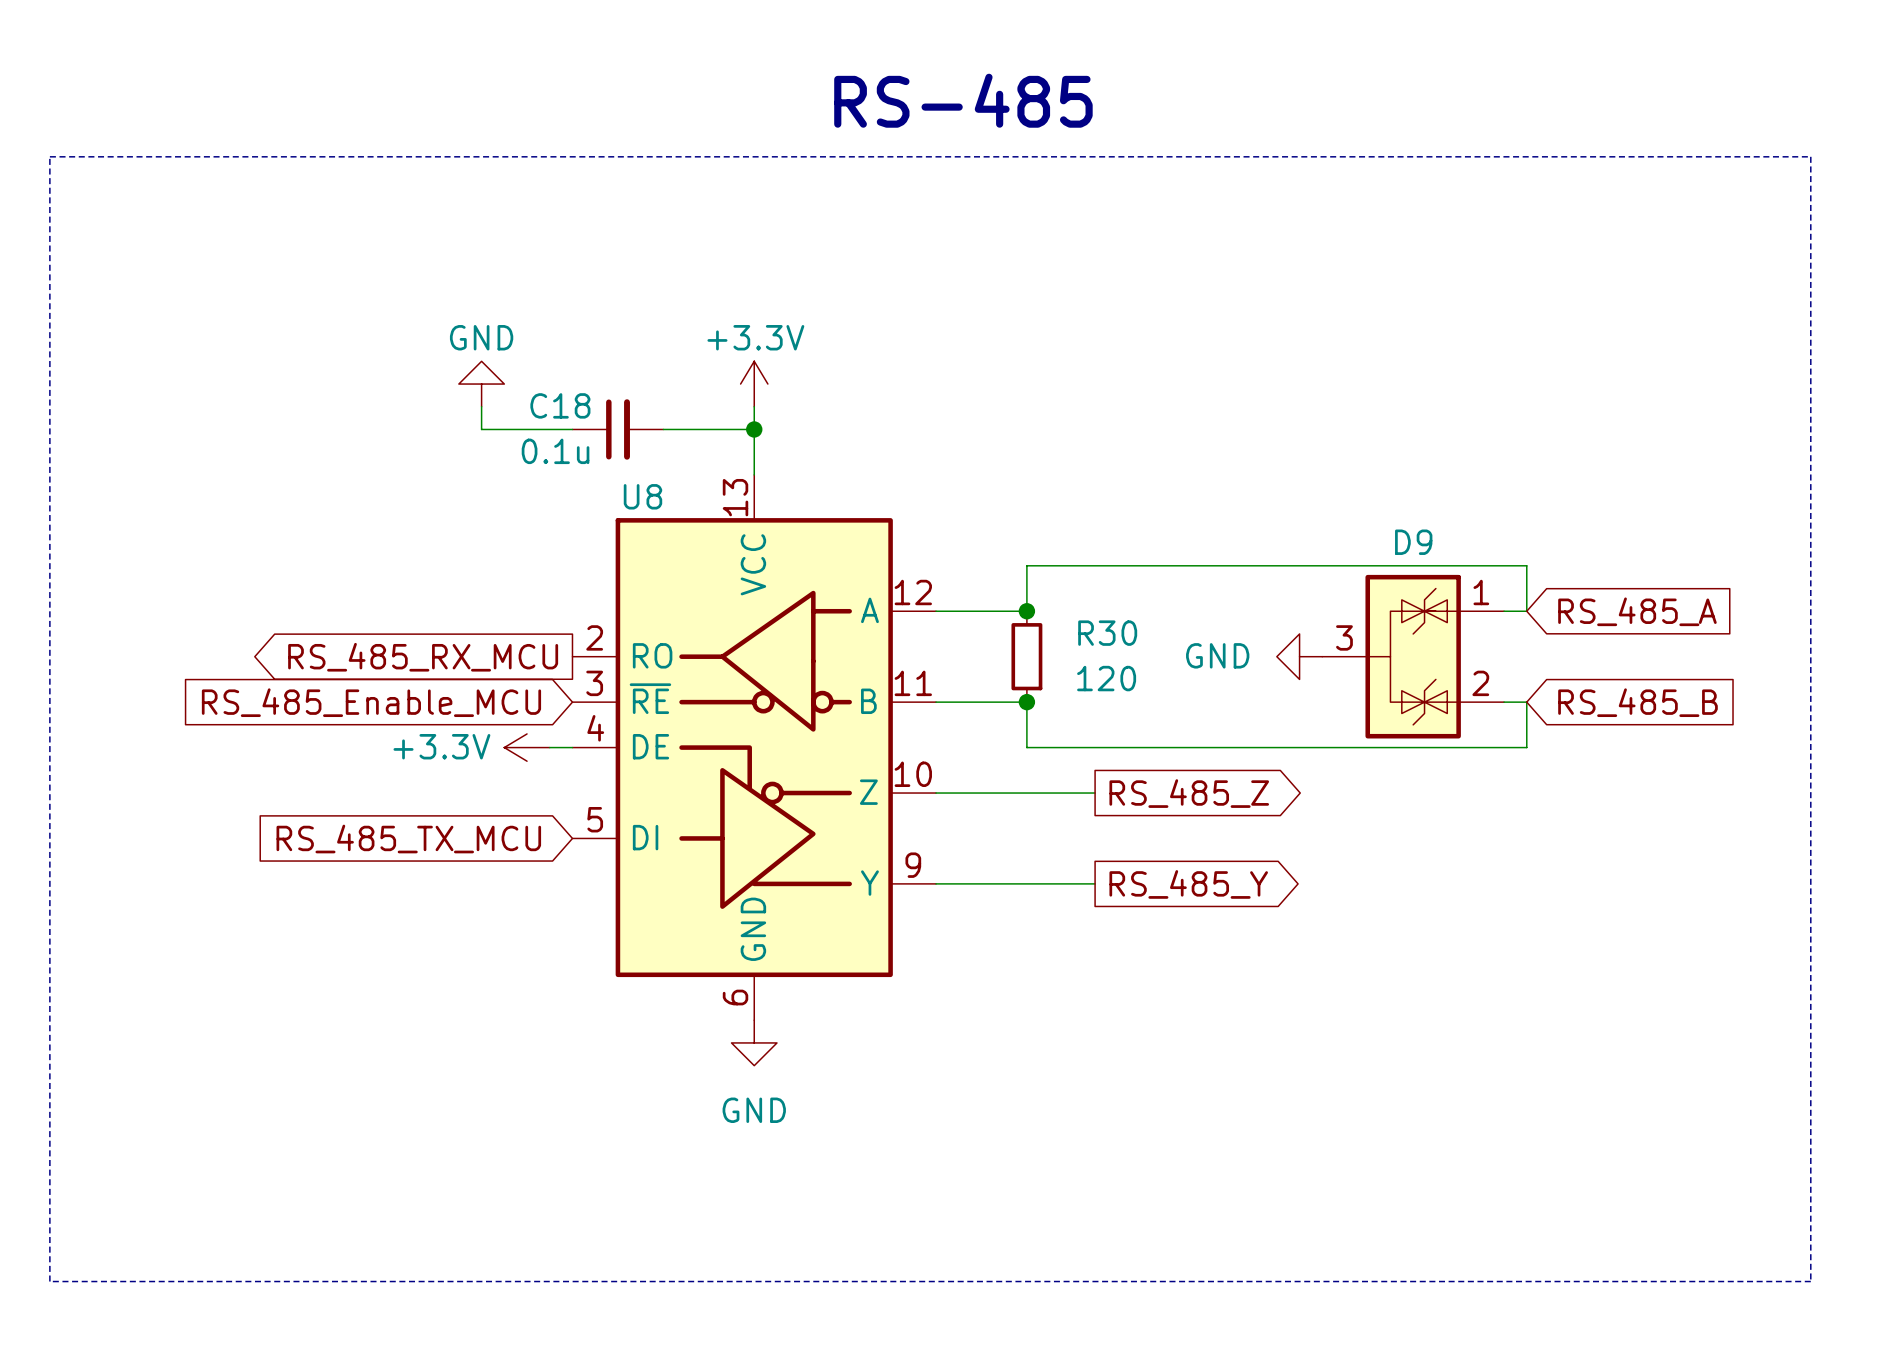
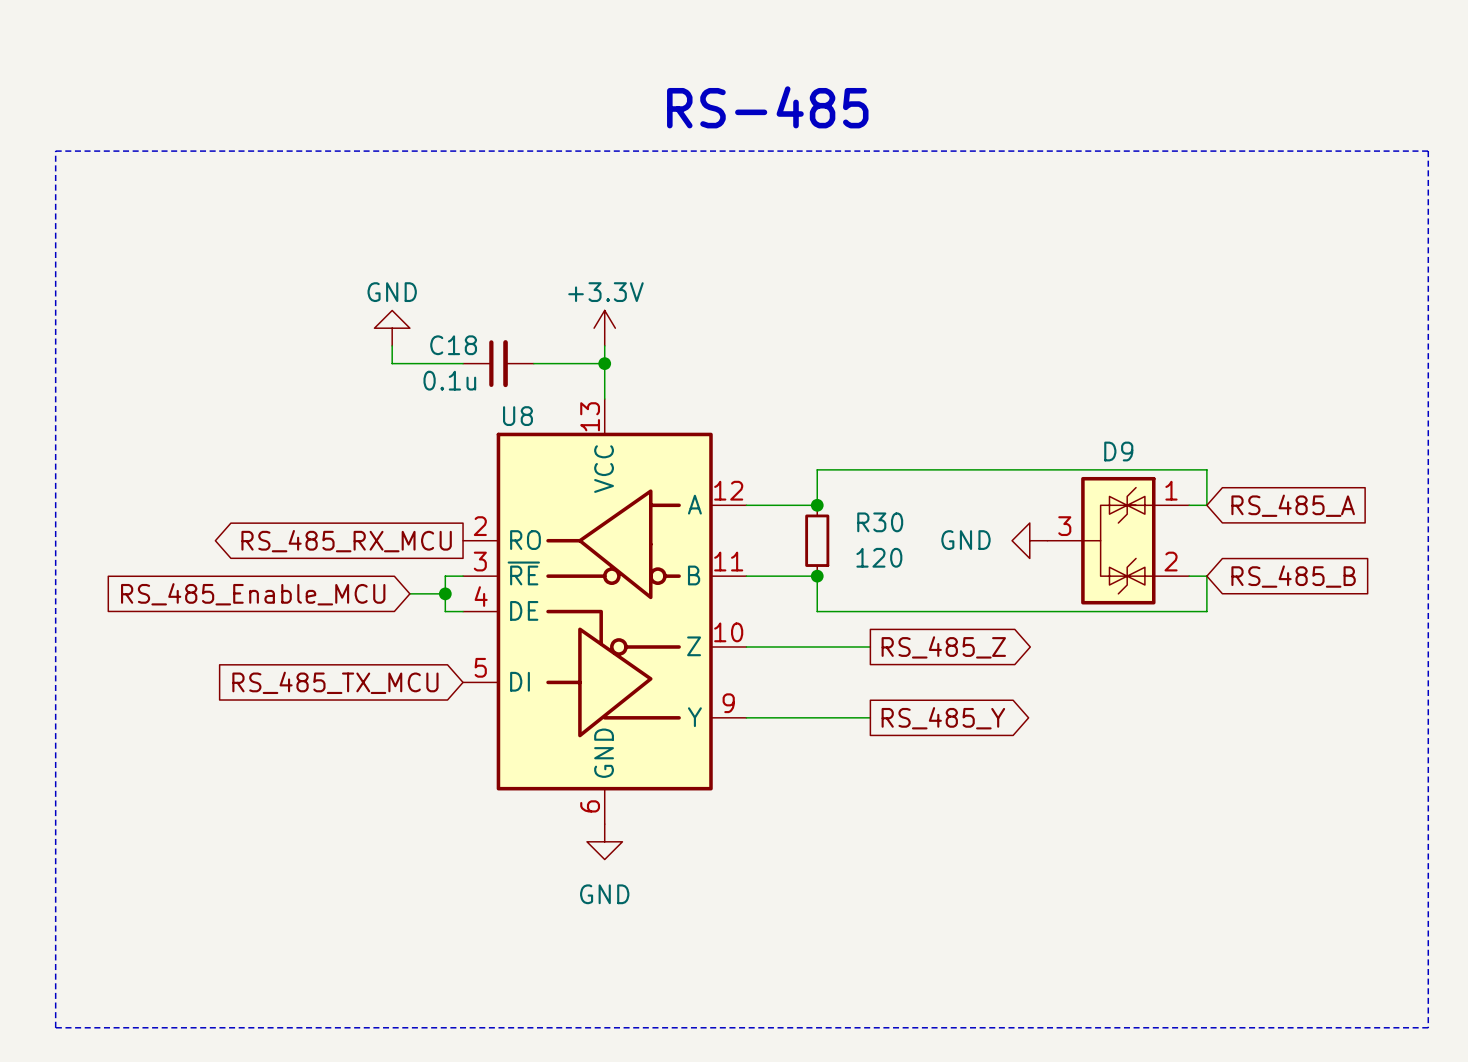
global label position: RS_485_Enable_MCU (371, 702) -> RS_485_Enable_MCU (253, 594)
wire: none -> (463, 576) (445, 576) (445, 611)
junction: none -> (445, 593)
power symbol: +3.3V (527, 747) -> none

